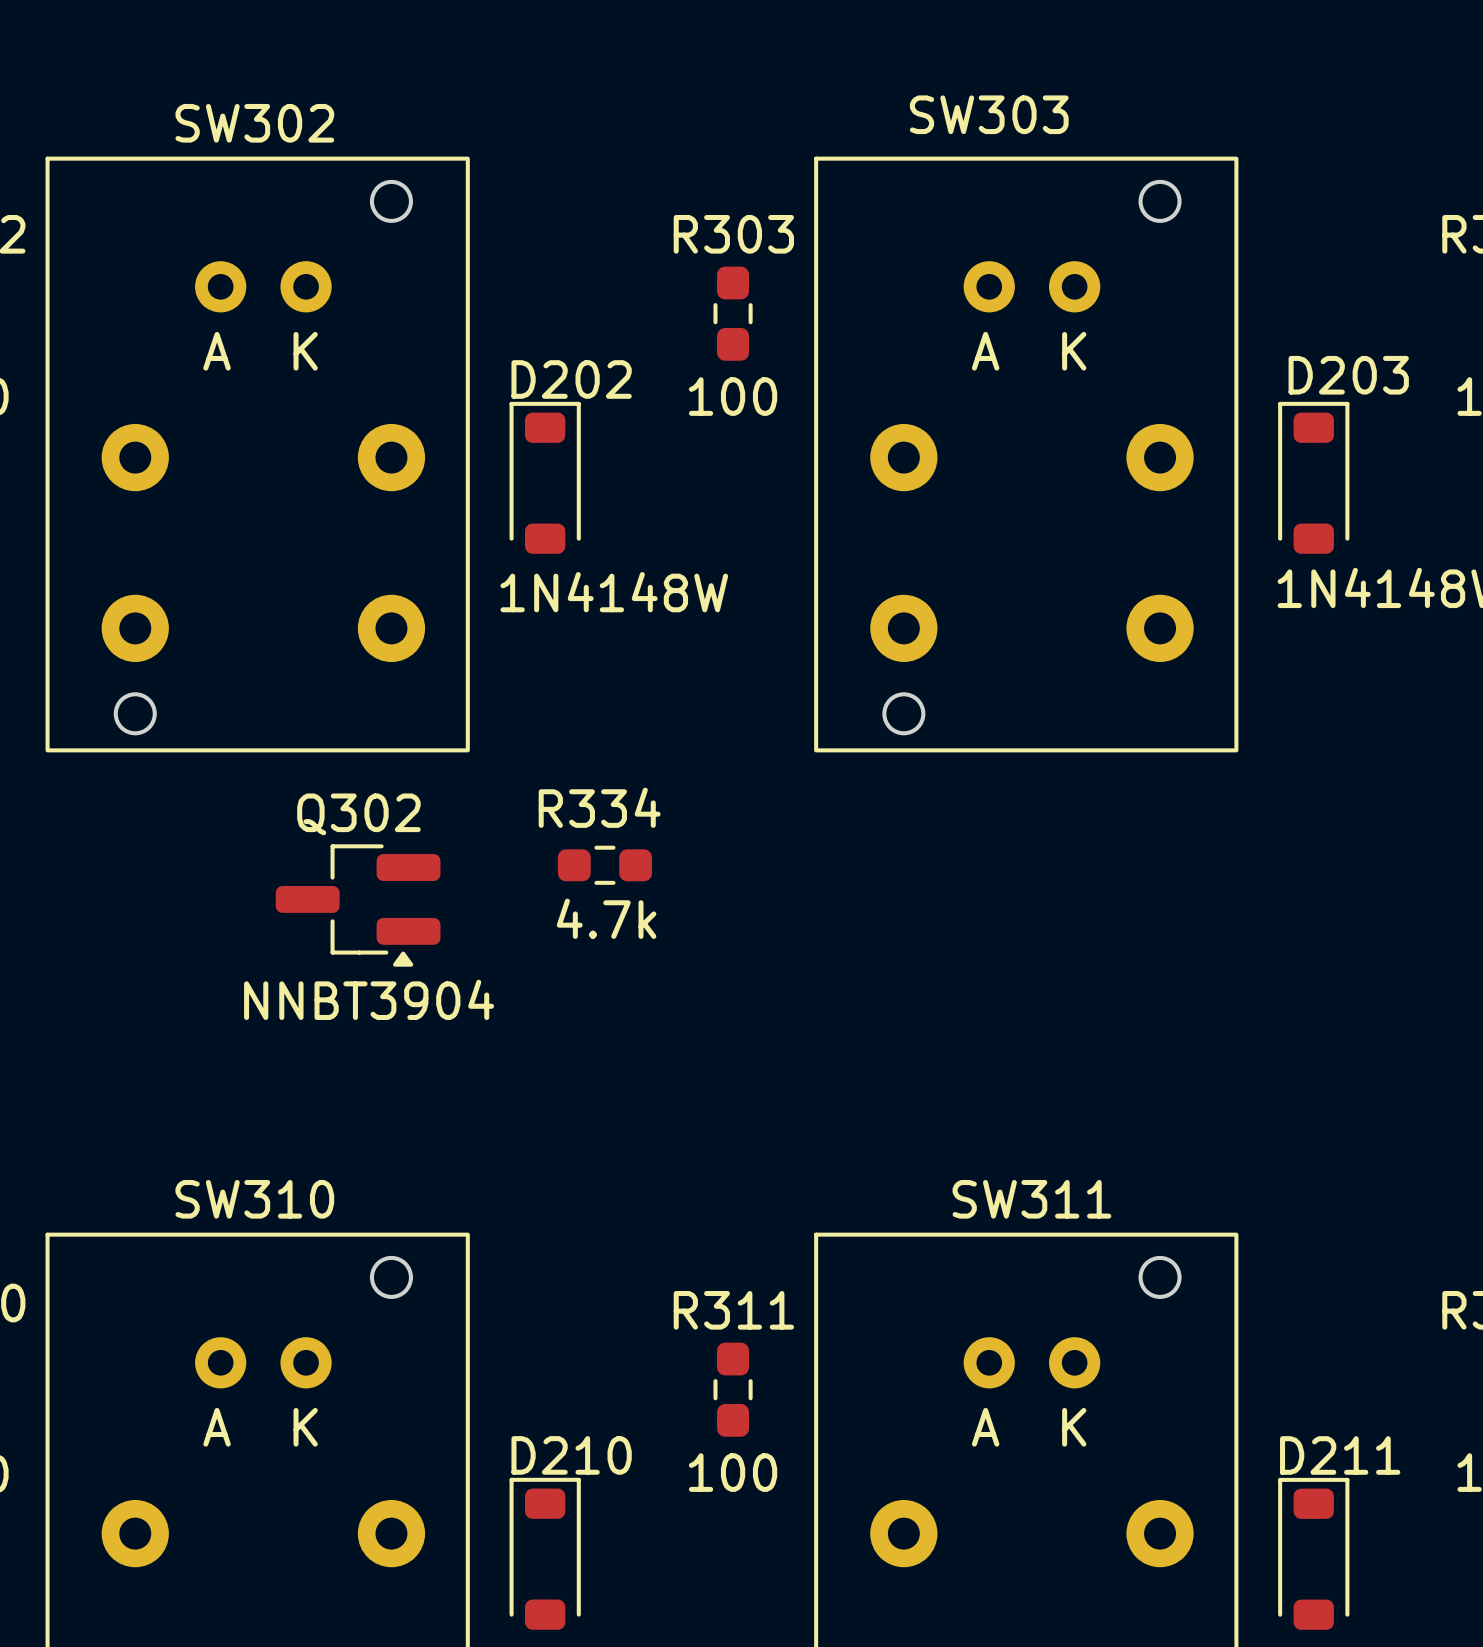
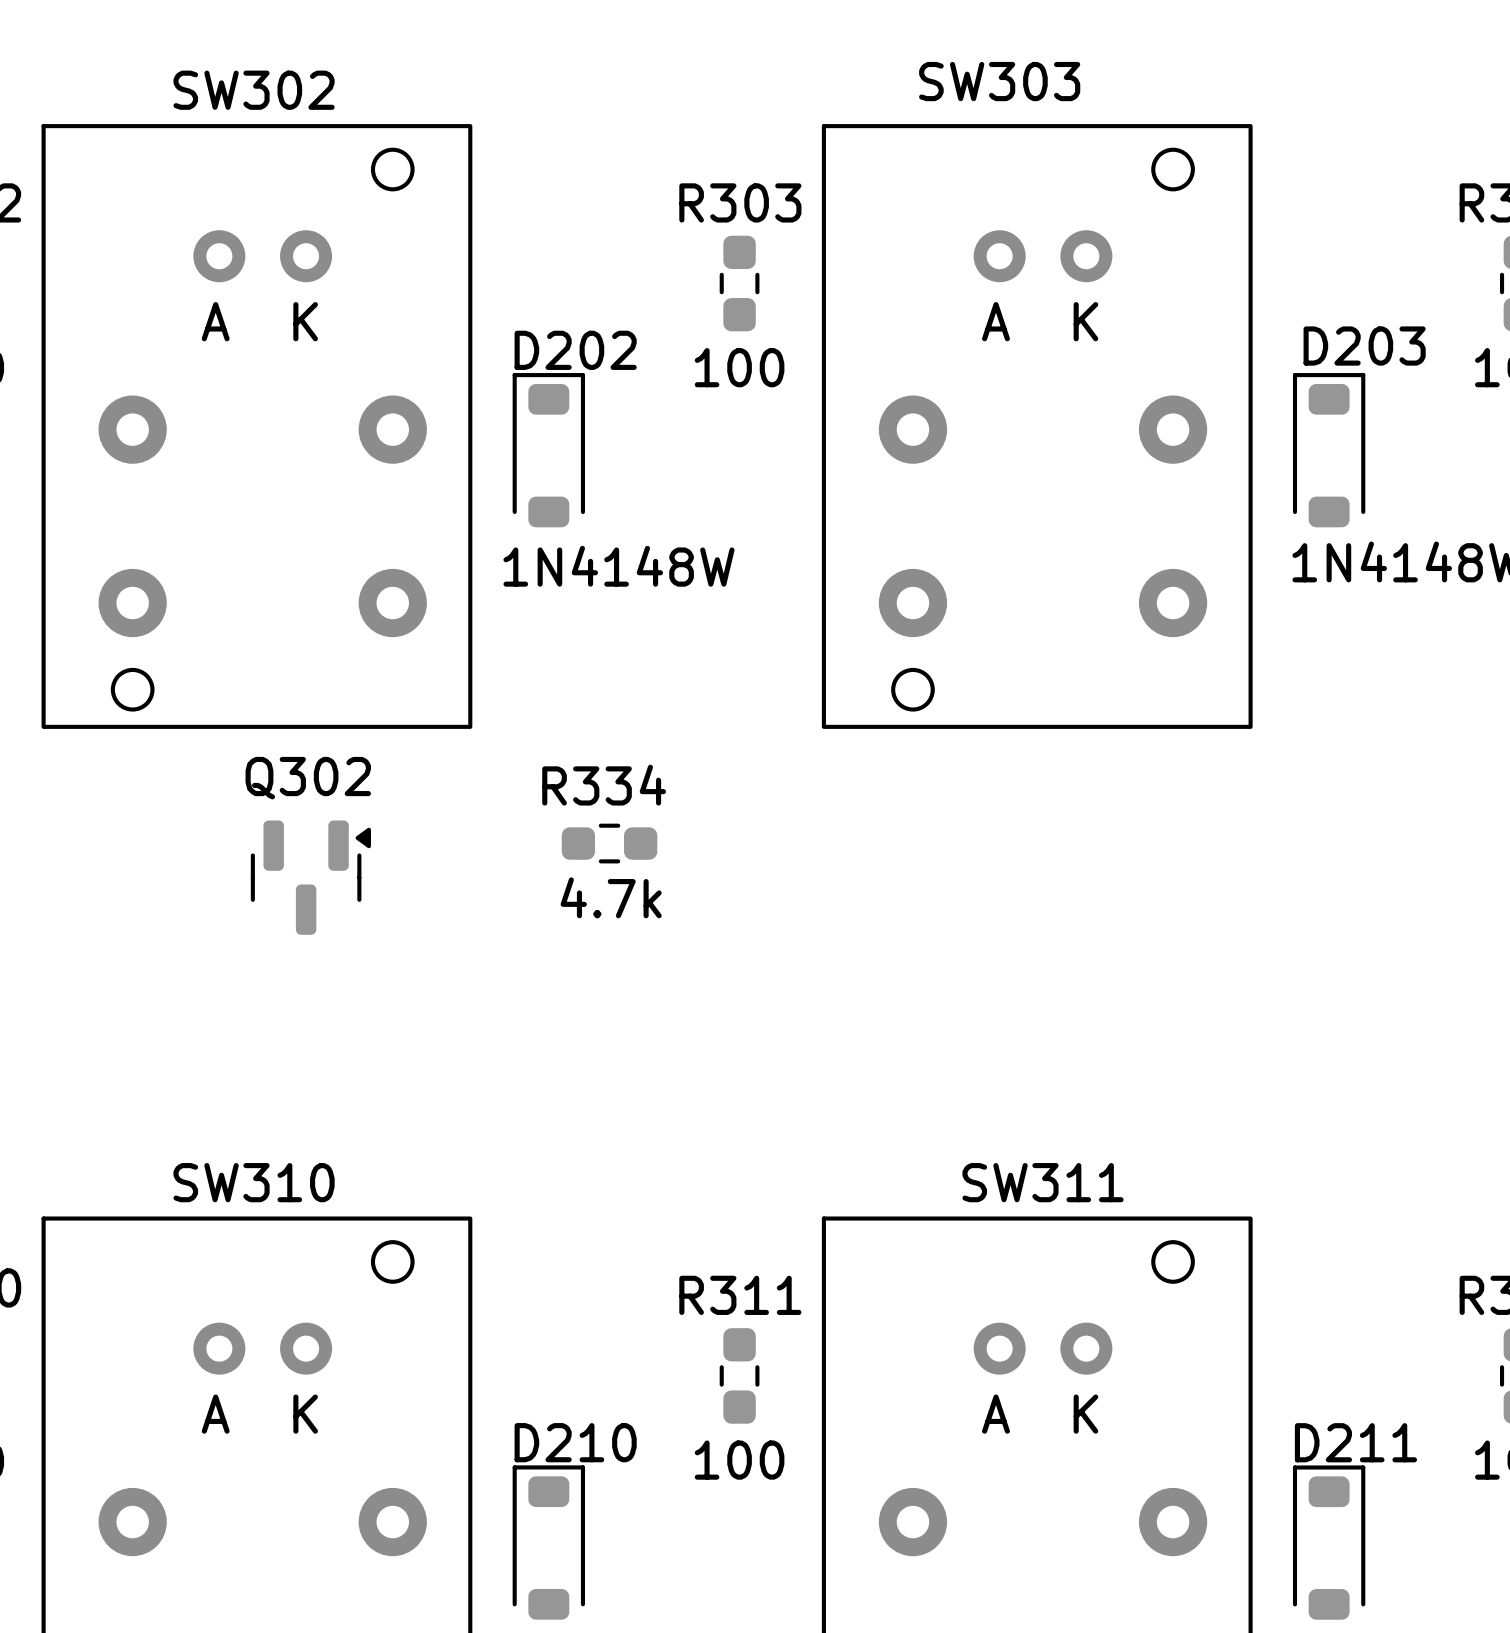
Q302 footprint: [275, 844, 441, 967] -> [250, 820, 371, 935]
Q302 value: NNBT3904 (369, 999) -> none

